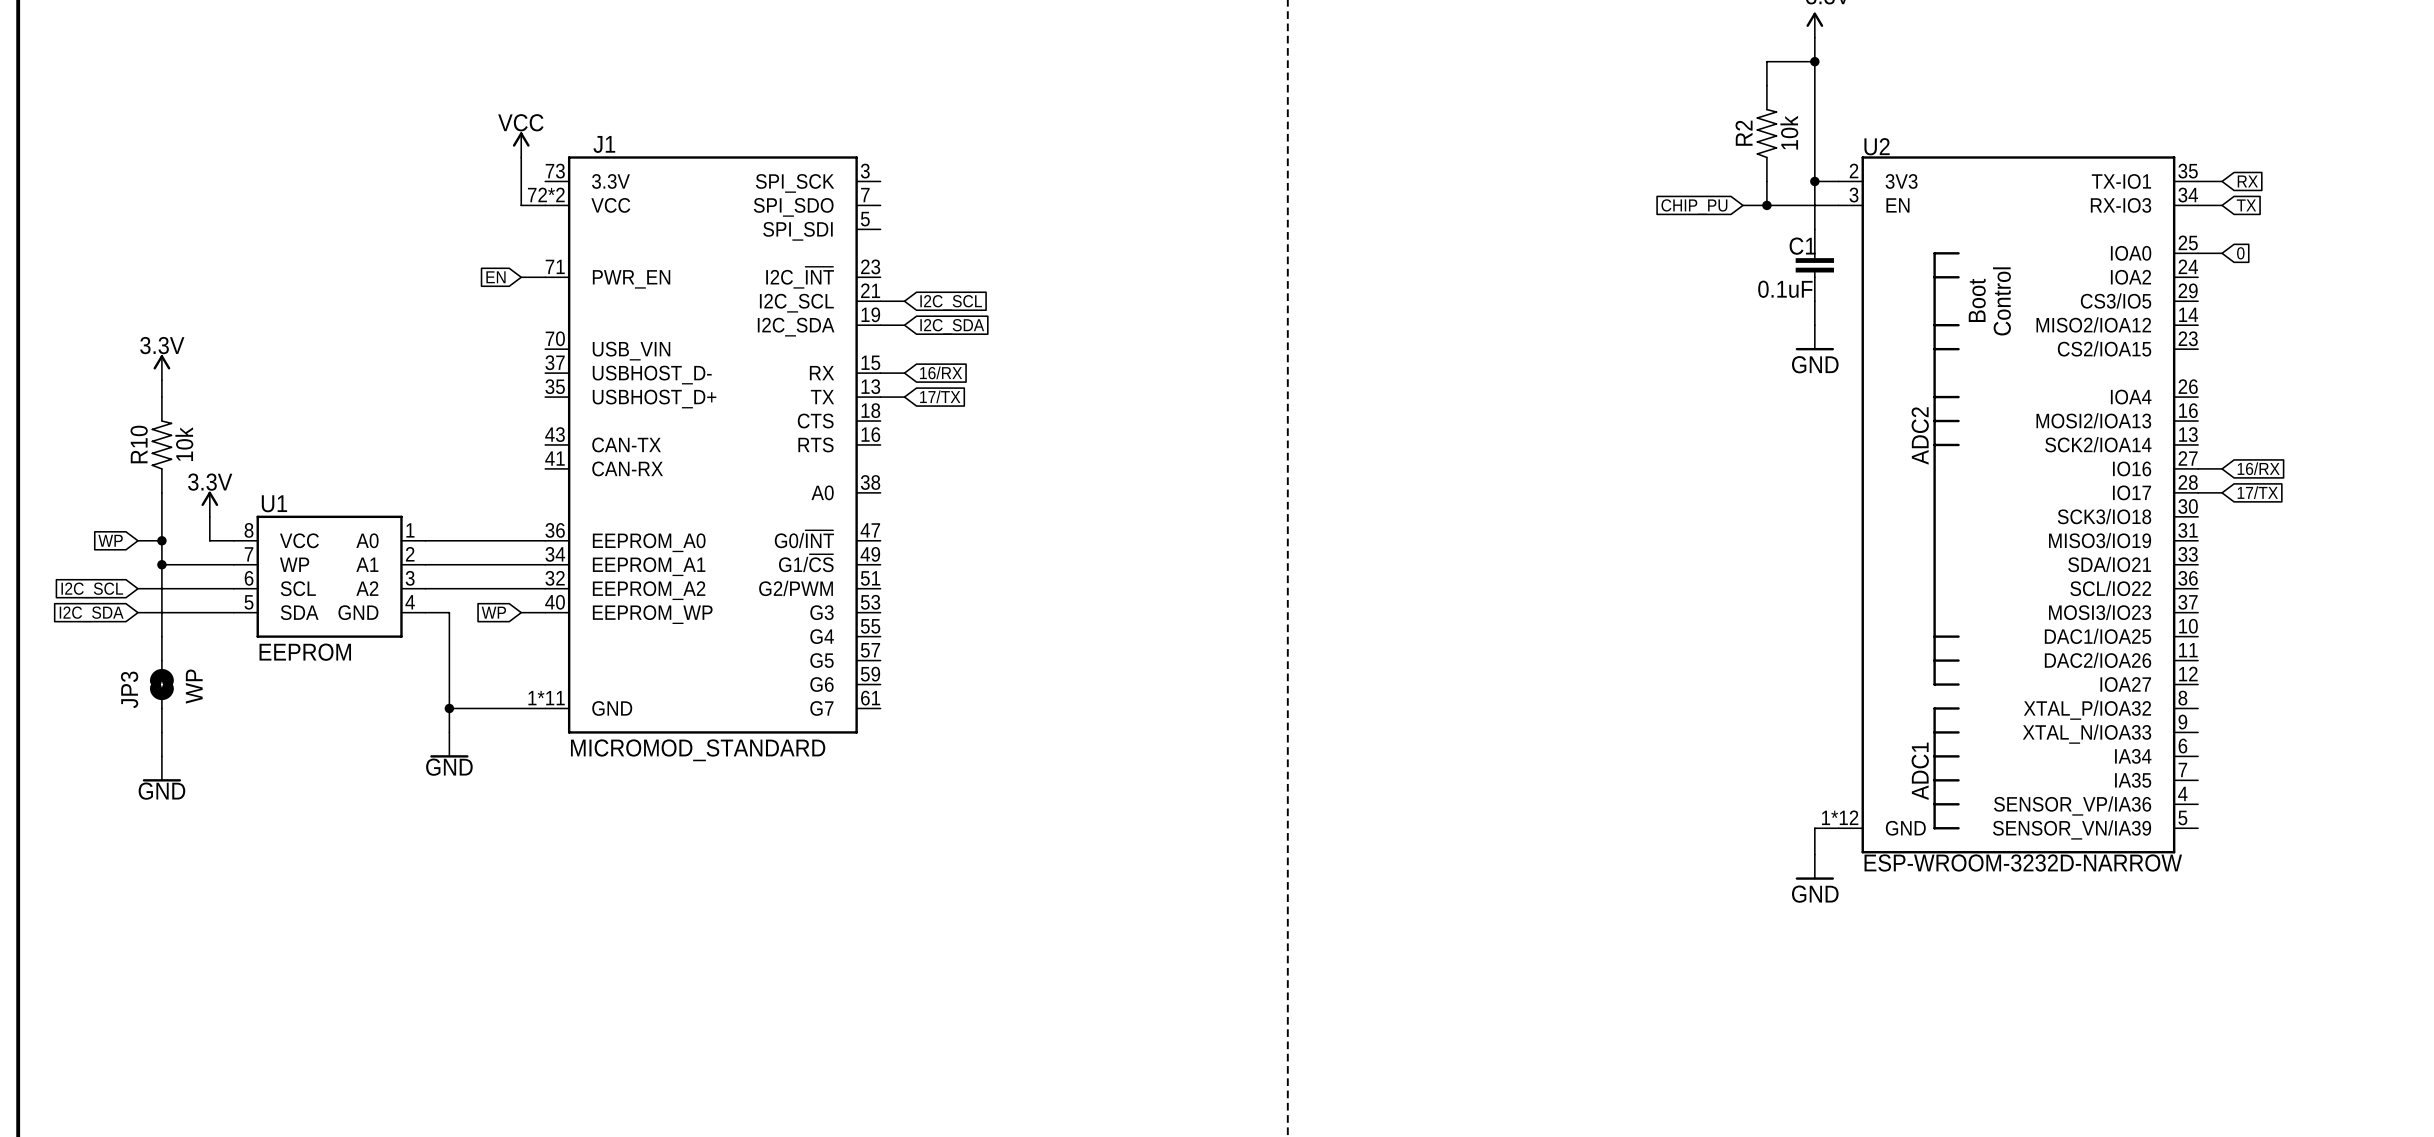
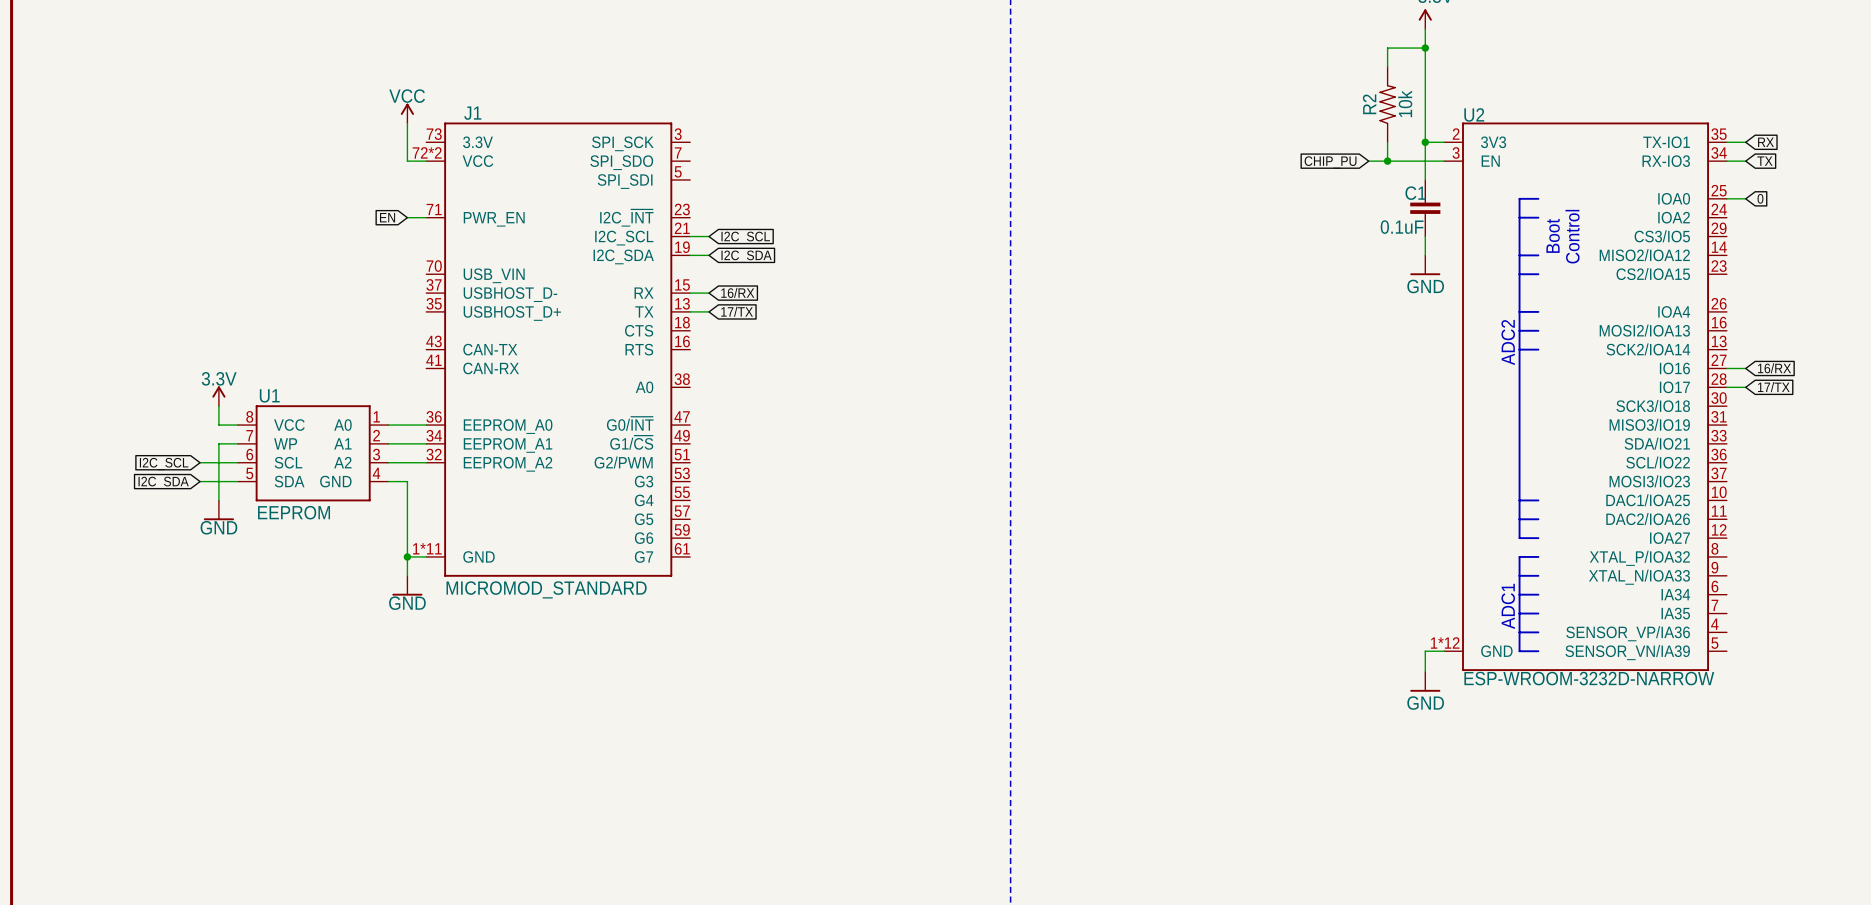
J1 symbol: [545, 156, 881, 734] -> [426, 122, 691, 577]
power symbol: 3.3V (161, 367) -> none
wire: (161, 380) (161, 397) -> none
R10: 10k (161, 444) -> none
wire: (161, 492) (161, 636) -> none
power symbol position: 3.3V (209, 504) -> 3.3V (218, 396)
wire: (209, 516) (209, 540) (233, 540) -> (218, 406) (218, 425) (237, 425)
global label: WP (110, 540) -> none
wire: (137, 540) (161, 540) -> none
junction: (161, 540) -> none
wire: (425, 540) (497, 540) -> none
wire: (161, 564) (233, 564) -> none
junction: (161, 564) -> none
wire: none -> (237, 443) (218, 443) (218, 500)
wire: (425, 564) (497, 564) -> none
U1 position: (329, 576) -> (313, 453)
wire: (137, 588) (233, 588) -> none
wire: none -> (200, 462) (237, 462)
wire: (425, 588) (497, 588) -> none
global label position: I2C_SCL (92, 590) -> I2C_SCL (164, 464)
wire: (137, 612) (233, 612) -> none
wire: none -> (200, 481) (237, 481)
wire: (425, 612) (449, 612) (449, 732) -> (388, 481) (407, 481) (407, 575)
global label: WP (493, 612) -> none
wire: (521, 612) (545, 612) -> none
global label position: I2C_SDA (91, 614) -> I2C_SDA (163, 482)
power symbol: none -> GND (218, 510)
JP3: (161, 684) -> none
text: WP (194, 686) -> none
wire: (449, 708) (521, 708) -> none
junction: (449, 708) -> none
junction: none -> (407, 556)
wire: (161, 732) (161, 756) -> none
power symbol position: GND (449, 745) -> GND (407, 585)
power symbol: GND (161, 768) -> none

